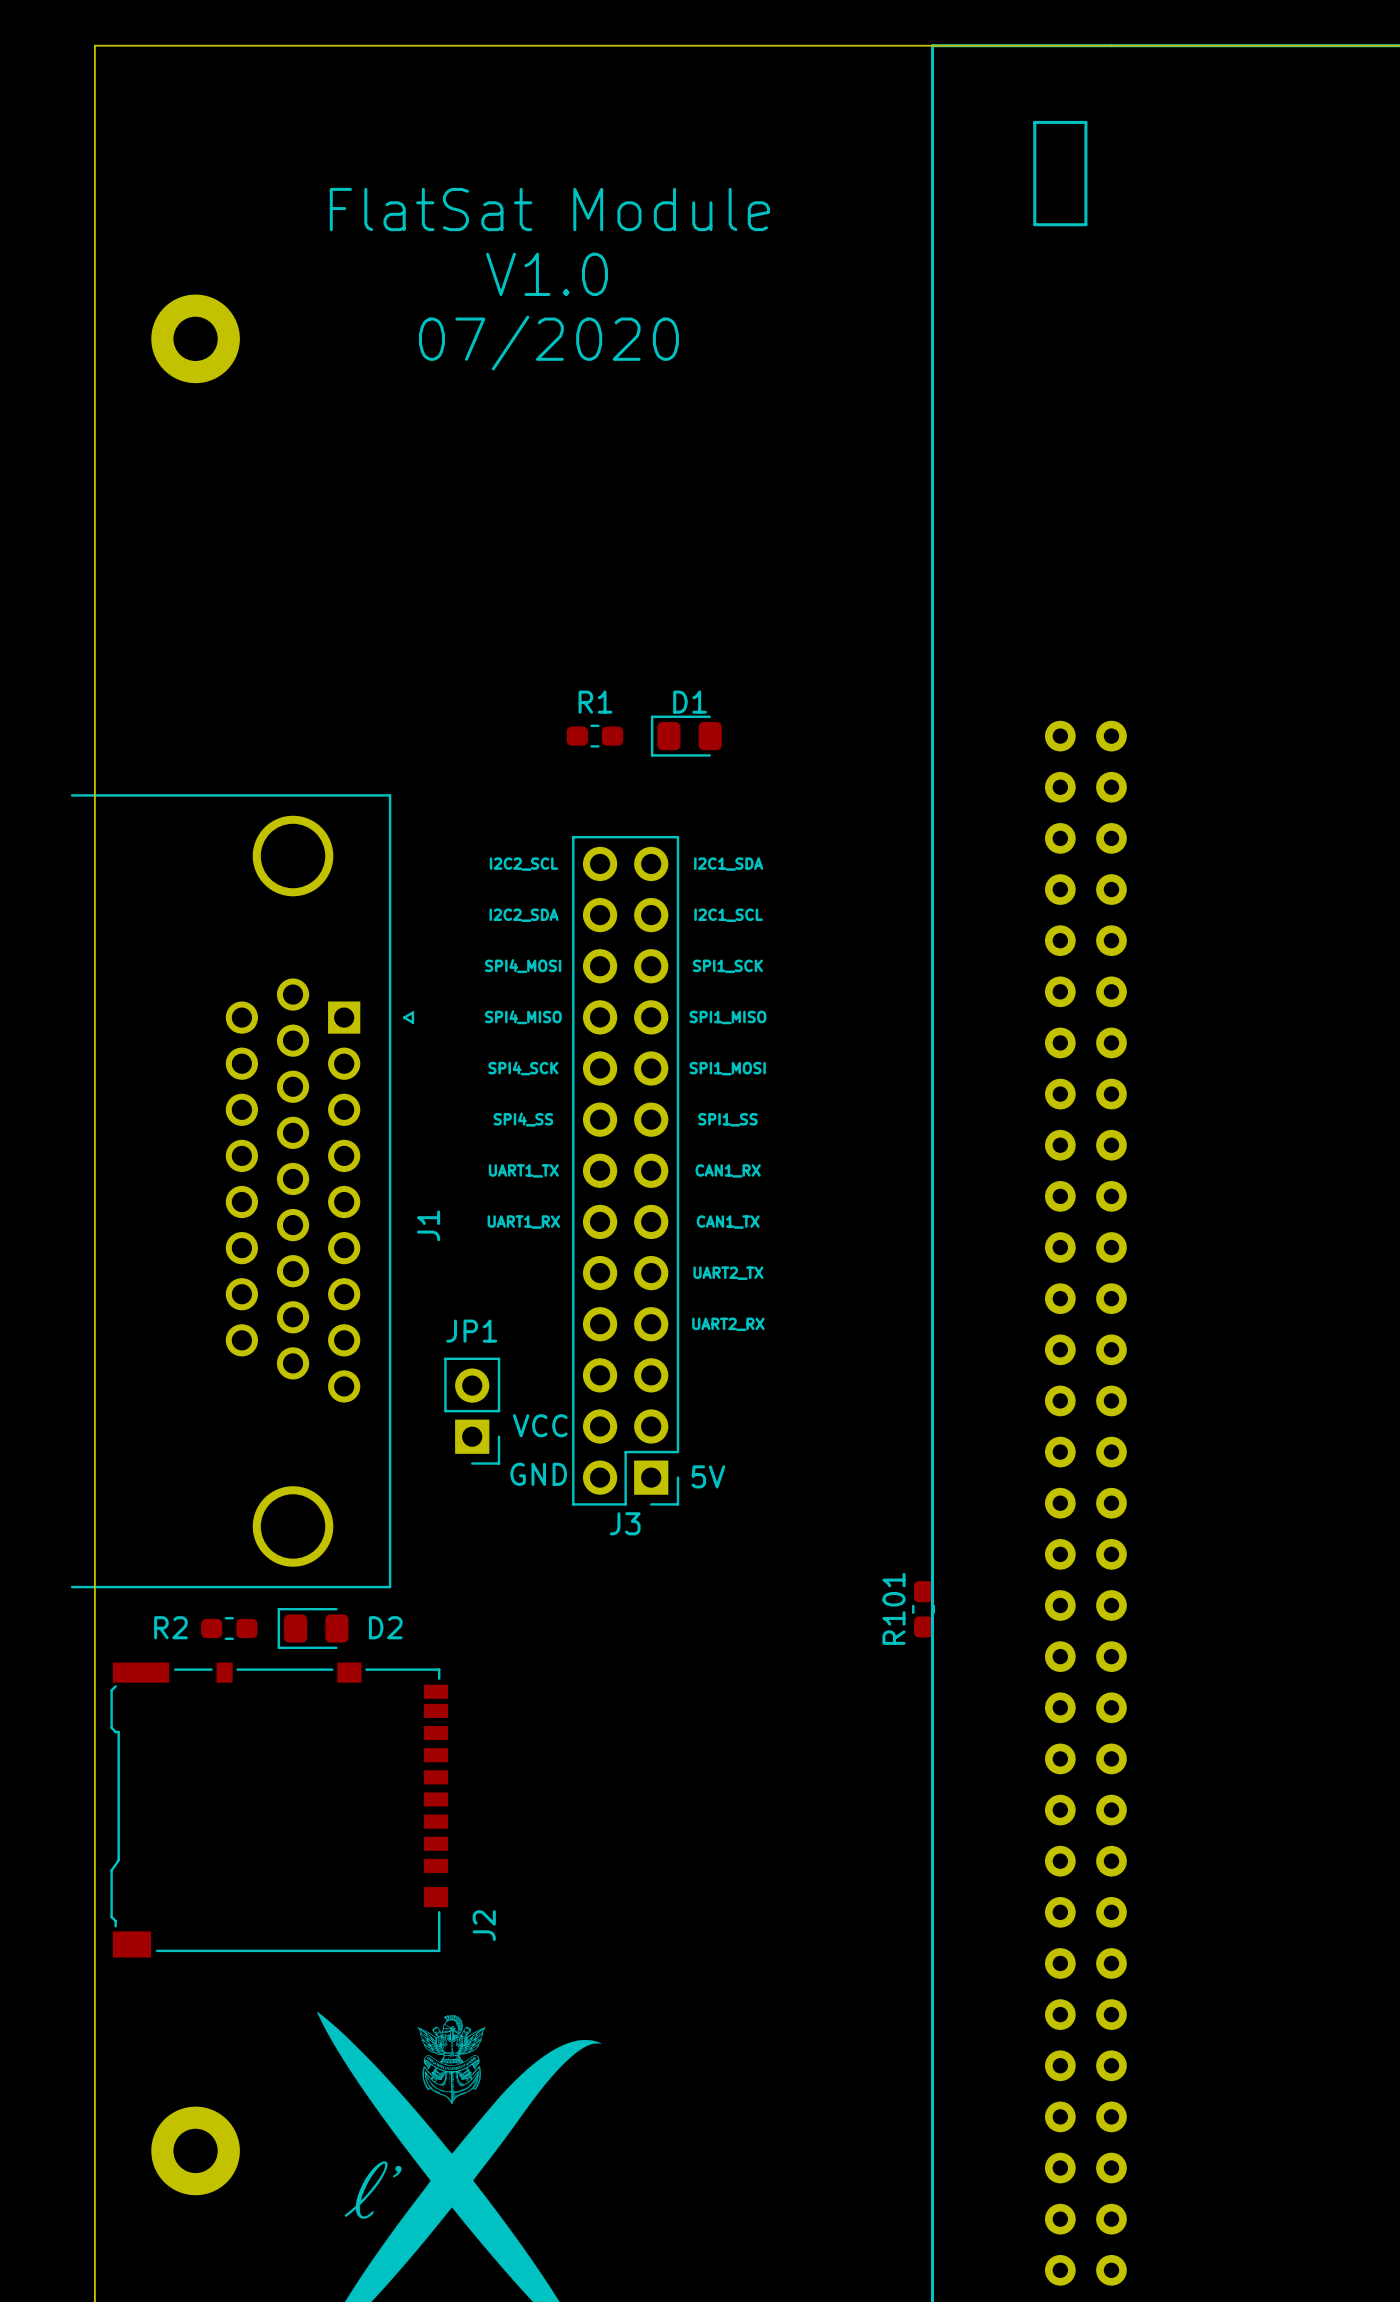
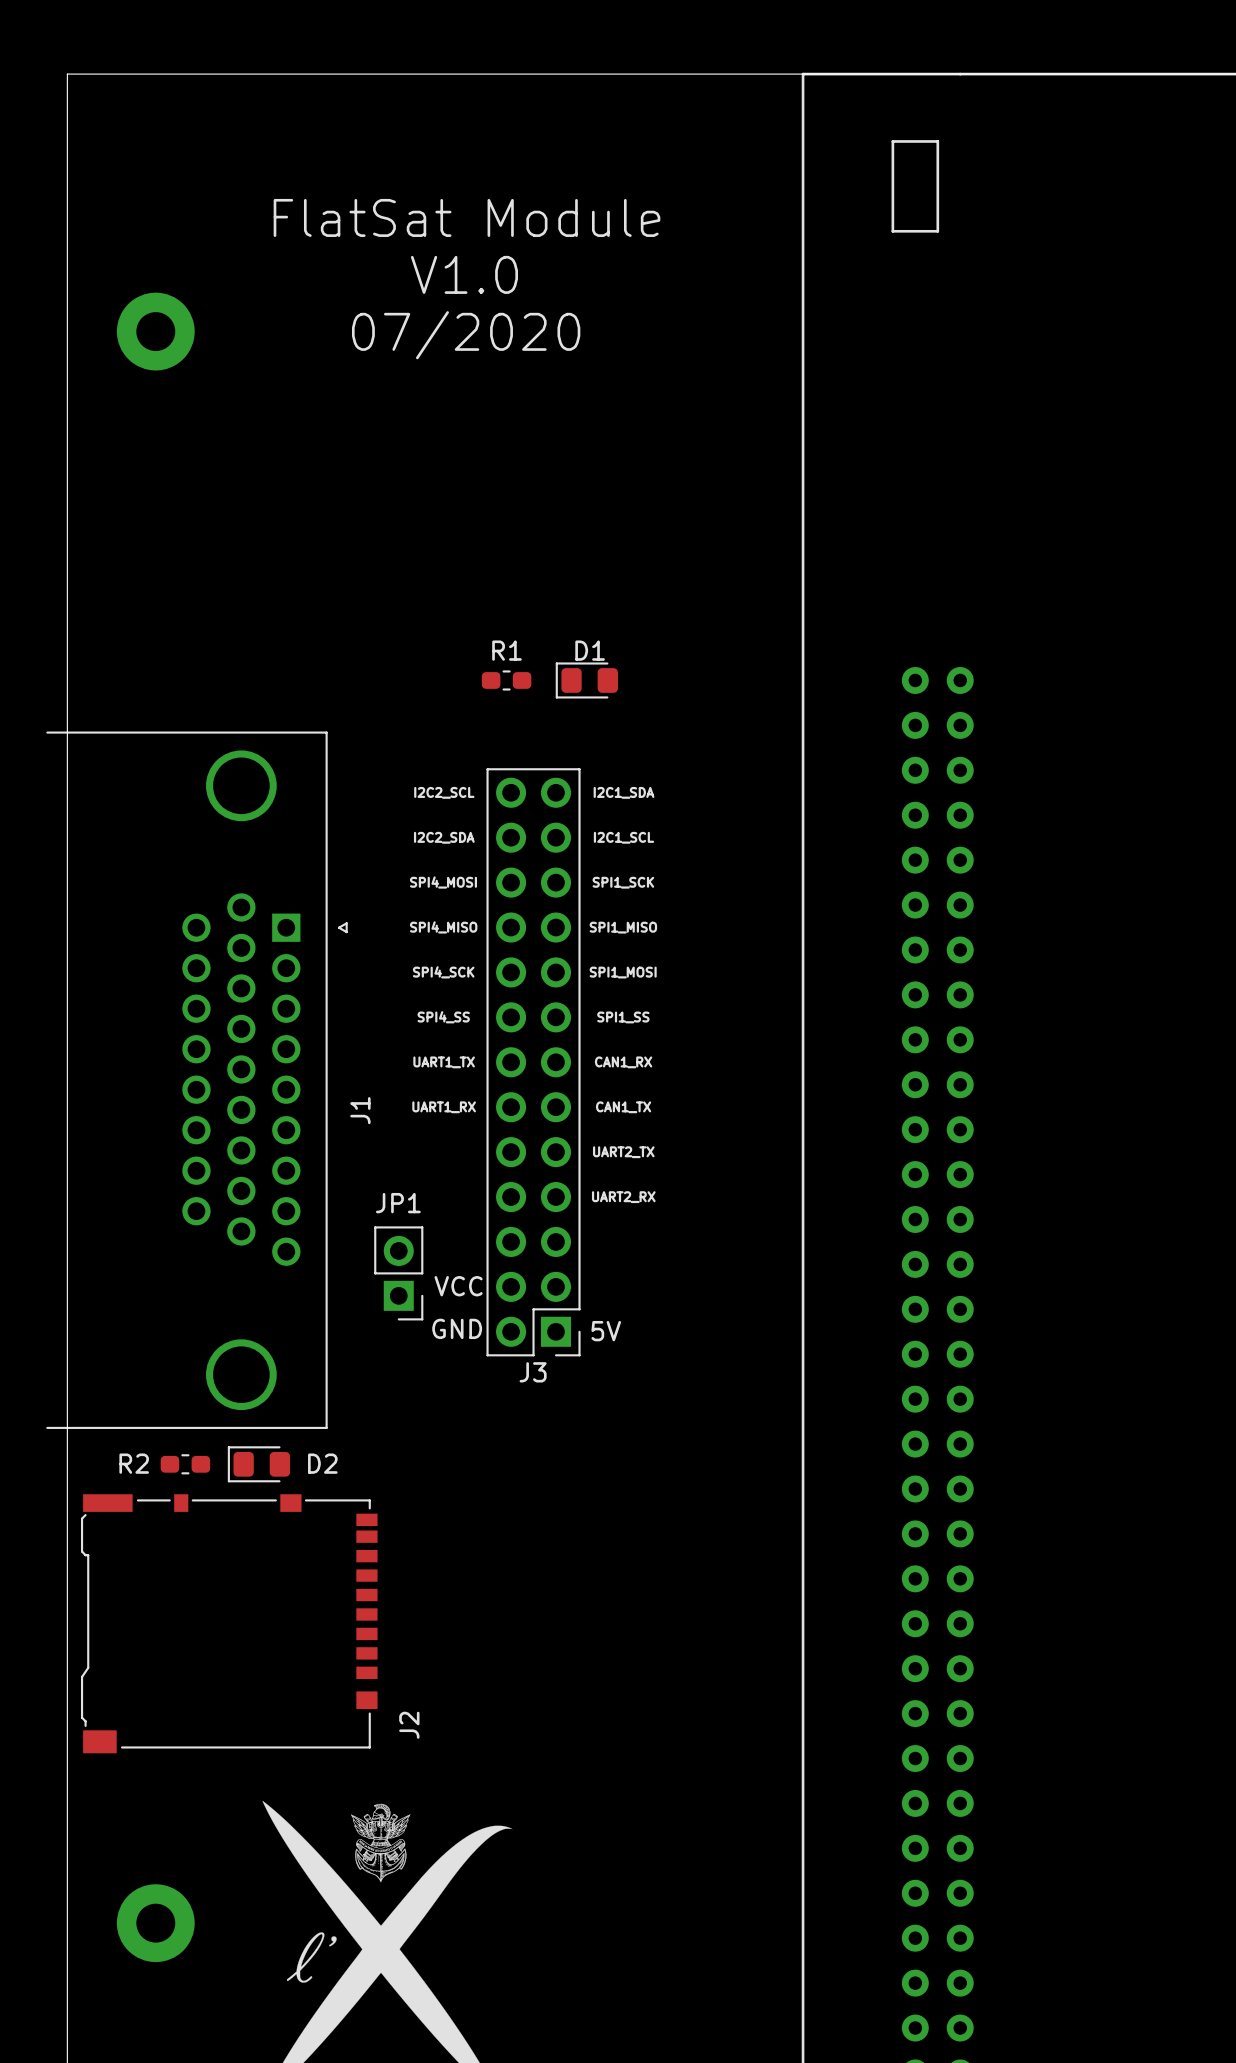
R101: (923, 1609) -> none

